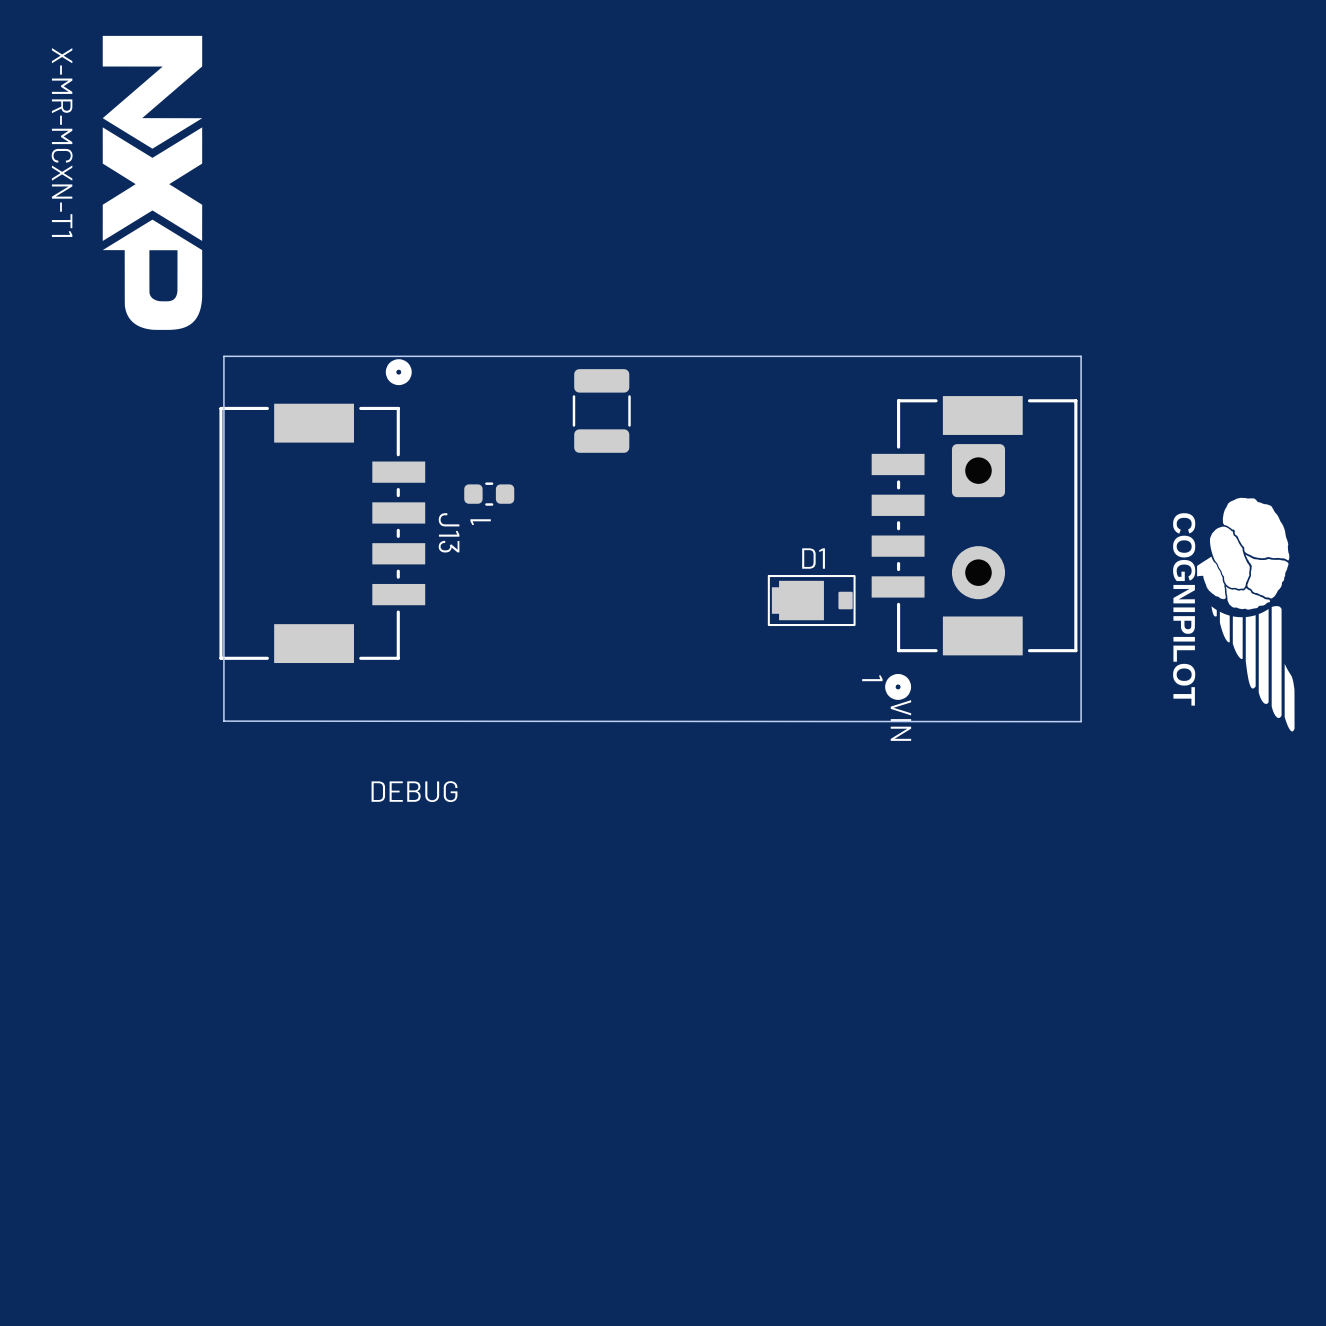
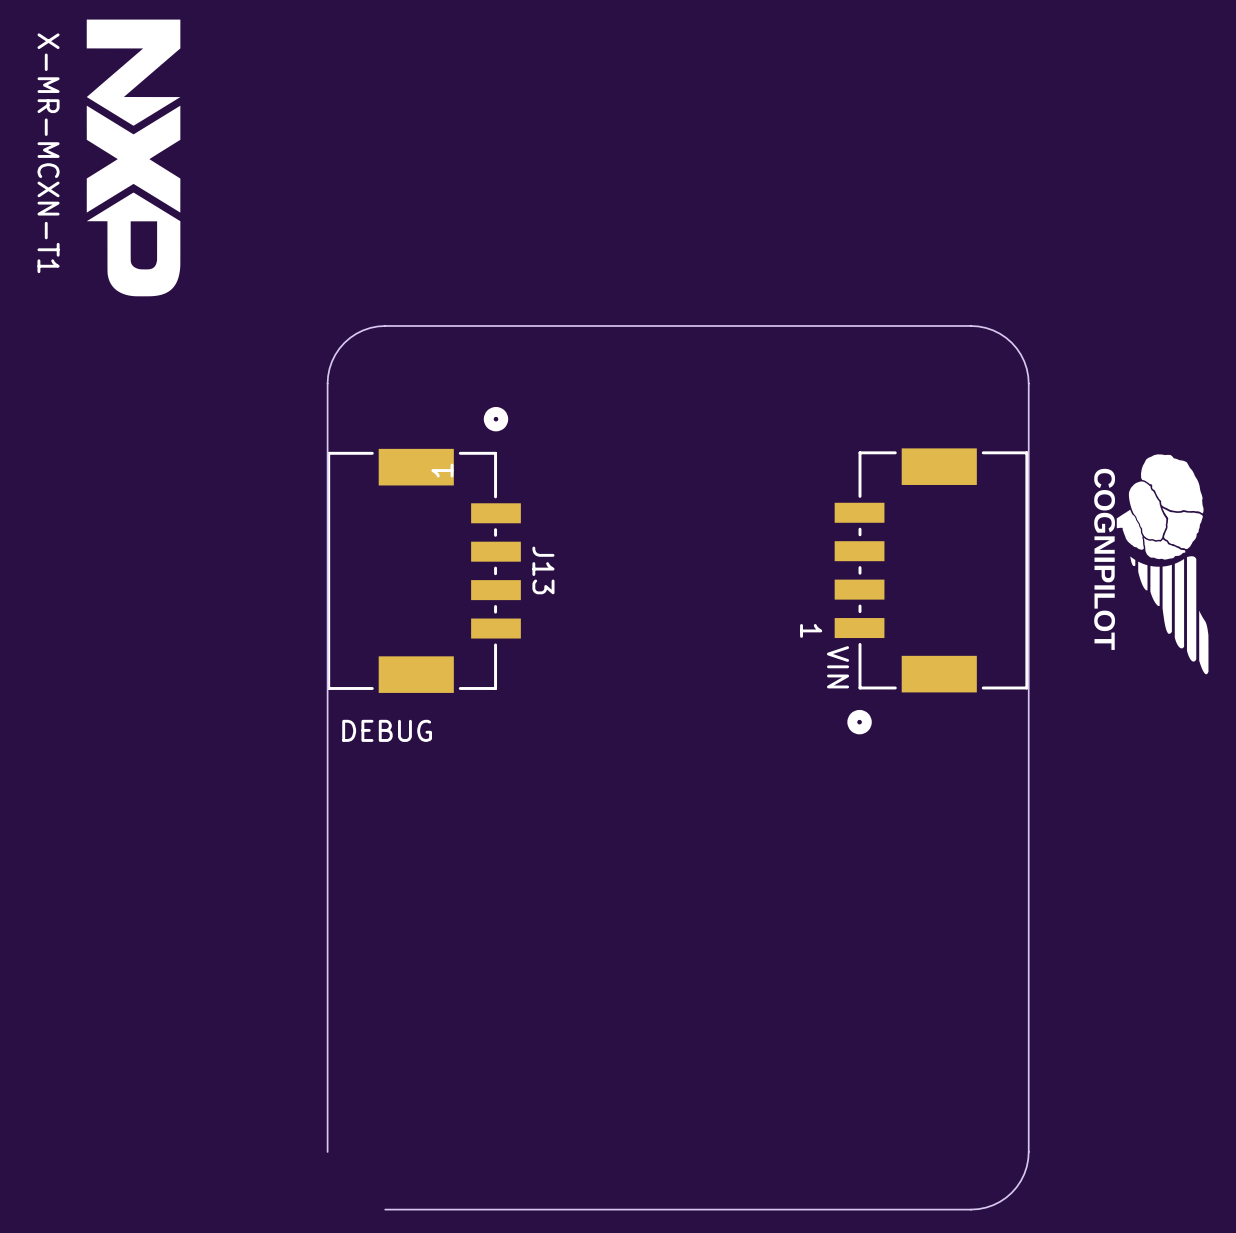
board edge: (1081, 356) (223, 356) (223, 721) (1081, 721) (1081, 356) -> none
part: (601, 410) -> none
part: (489, 494) -> none
J13 position: (322, 511) -> (424, 549)
part: (978, 521) -> none
part position: (974, 547) -> (931, 591)
D1: (811, 600) -> none
board edge: none -> (327, 1151) (327, 383) (329, 368) (339, 348) (350, 337) (363, 330) (385, 325) (971, 325) (986, 327) (1006, 337) (1016, 348) (1024, 361) (1028, 383) (1028, 1151) (1024, 1174) (1016, 1187) (1006, 1197) (993, 1205) (971, 1209) (385, 1209)

